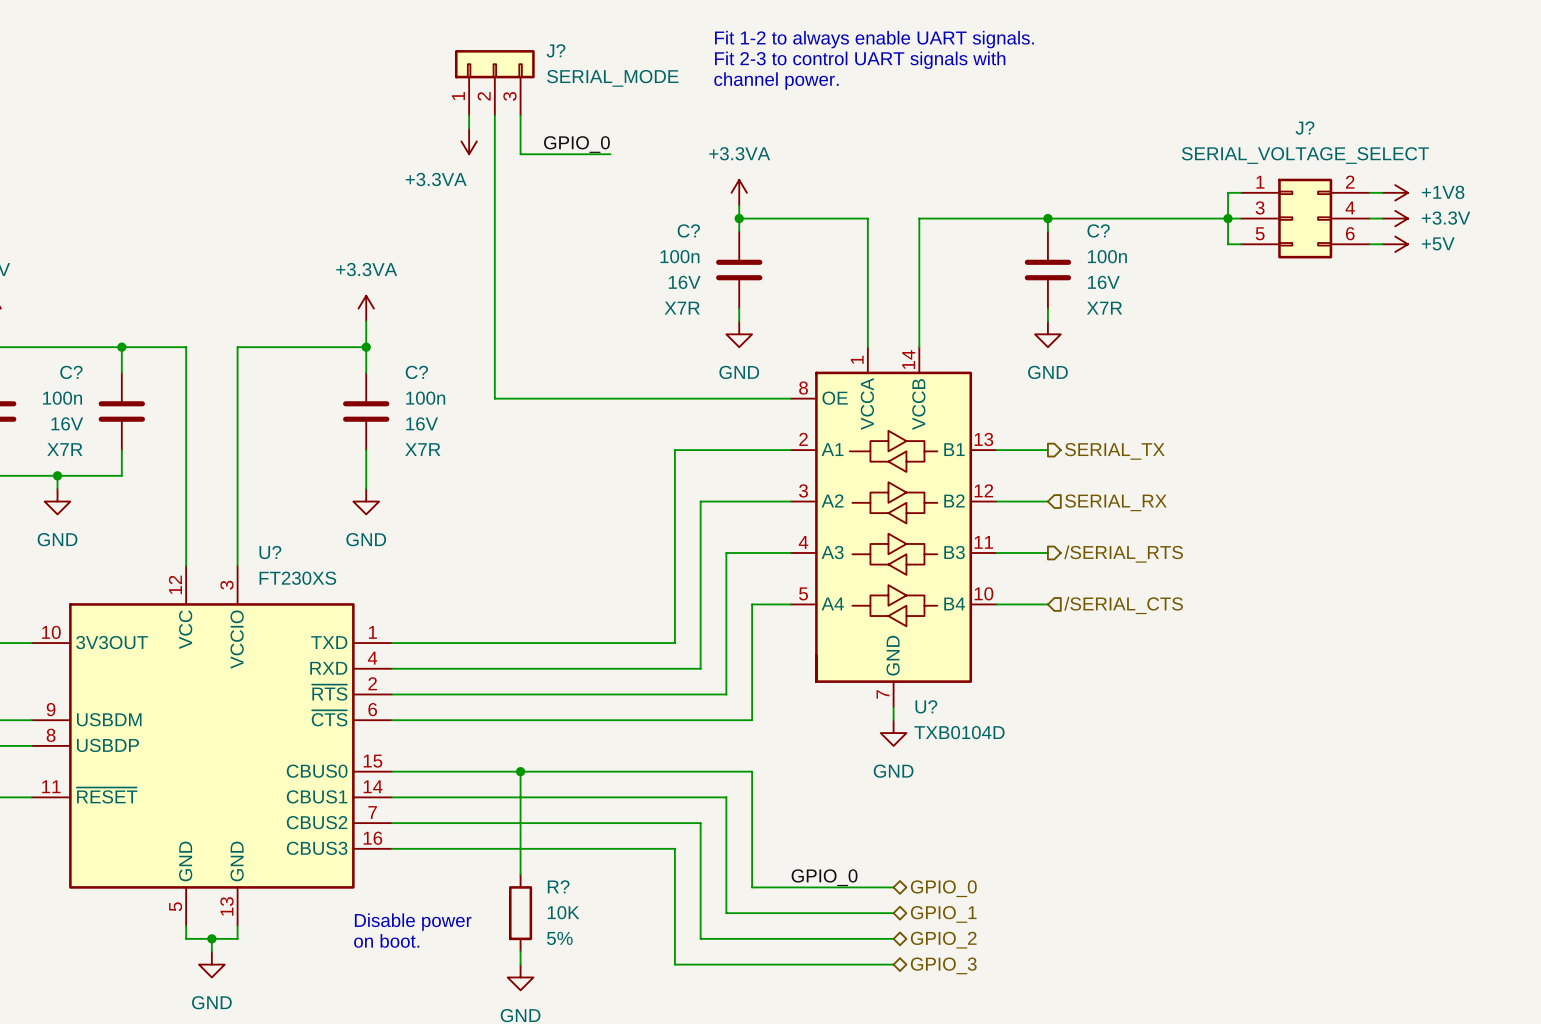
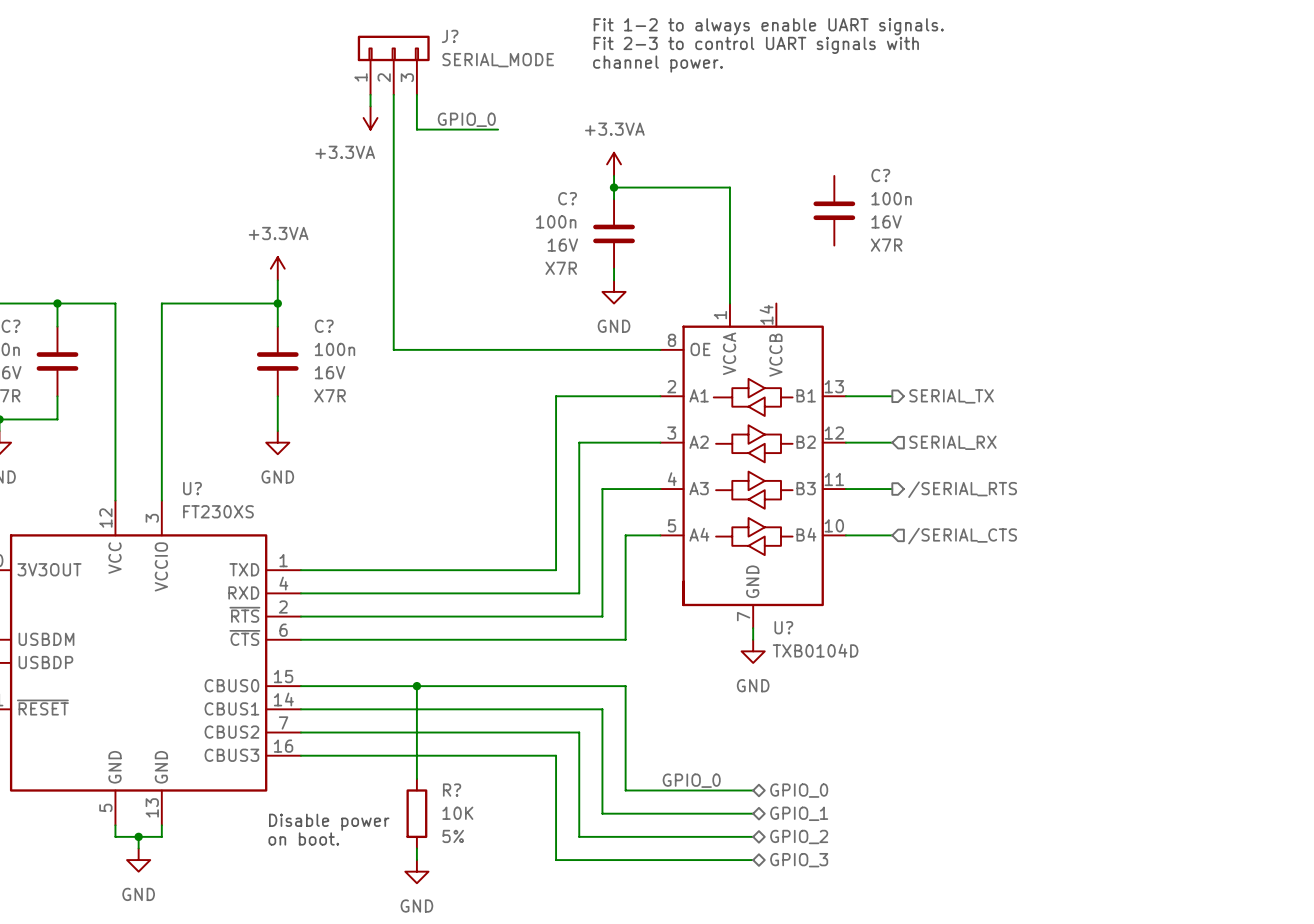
wire: (1240, 192) (1228, 192) (1228, 244) (1240, 244) -> none
wire: (1369, 192) (1382, 192) -> none
power symbol: +1V8 (1395, 192) -> none
wire: (1047, 218) (1047, 231) -> none
junction: (1047, 218) -> none
junction: (1228, 218) -> none
wire: (1240, 218) (919, 218) (919, 347) -> none
J?: SERIAL_VOLTAGE_SELECT (1305, 218) -> none
wire: (1369, 218) (1382, 218) -> none
power symbol: +3.3V (1395, 218) -> none
wire: (1369, 244) (1382, 244) -> none
power symbol: +5V (1395, 244) -> none
C? position: (1047, 270) -> (834, 210)
wire: (1047, 308) (1047, 321) -> none
power symbol: GND (1047, 334) -> none

